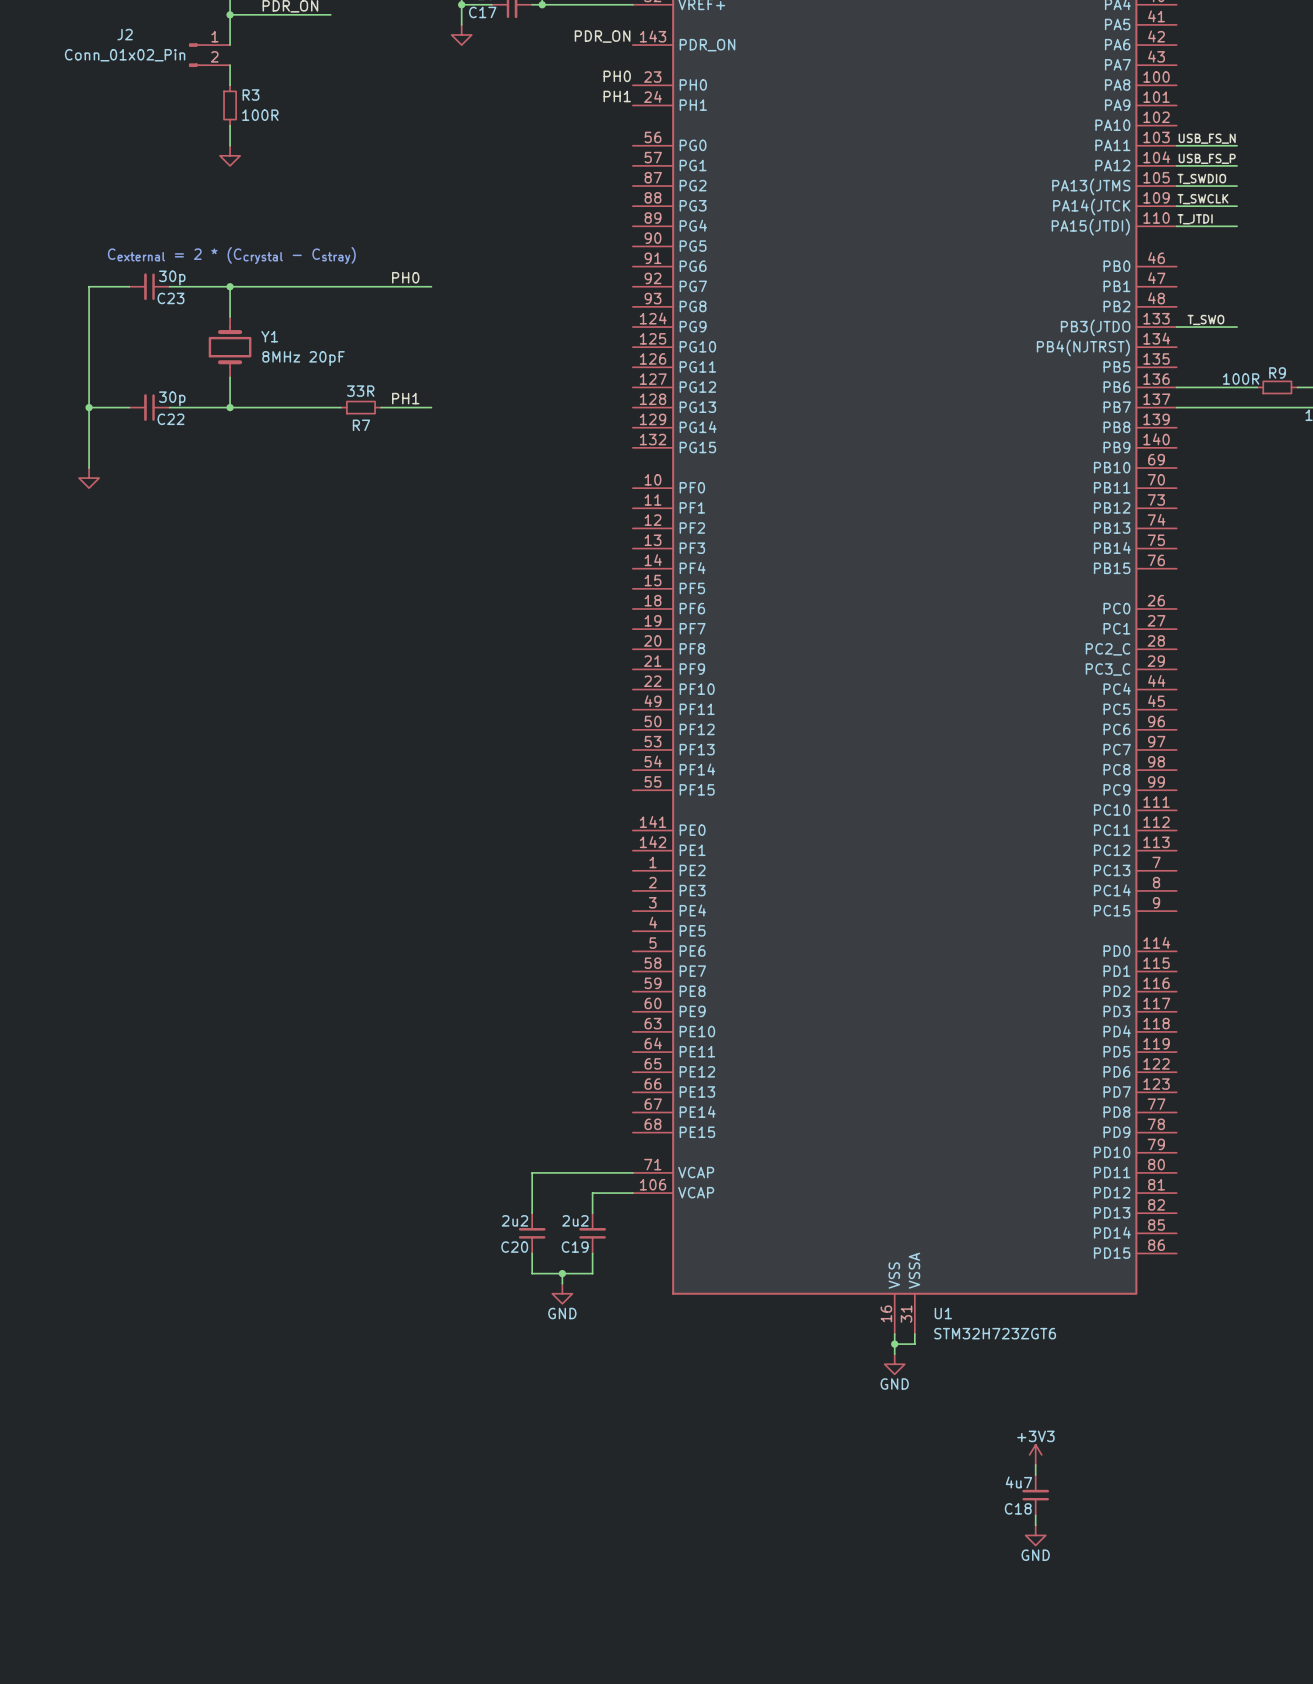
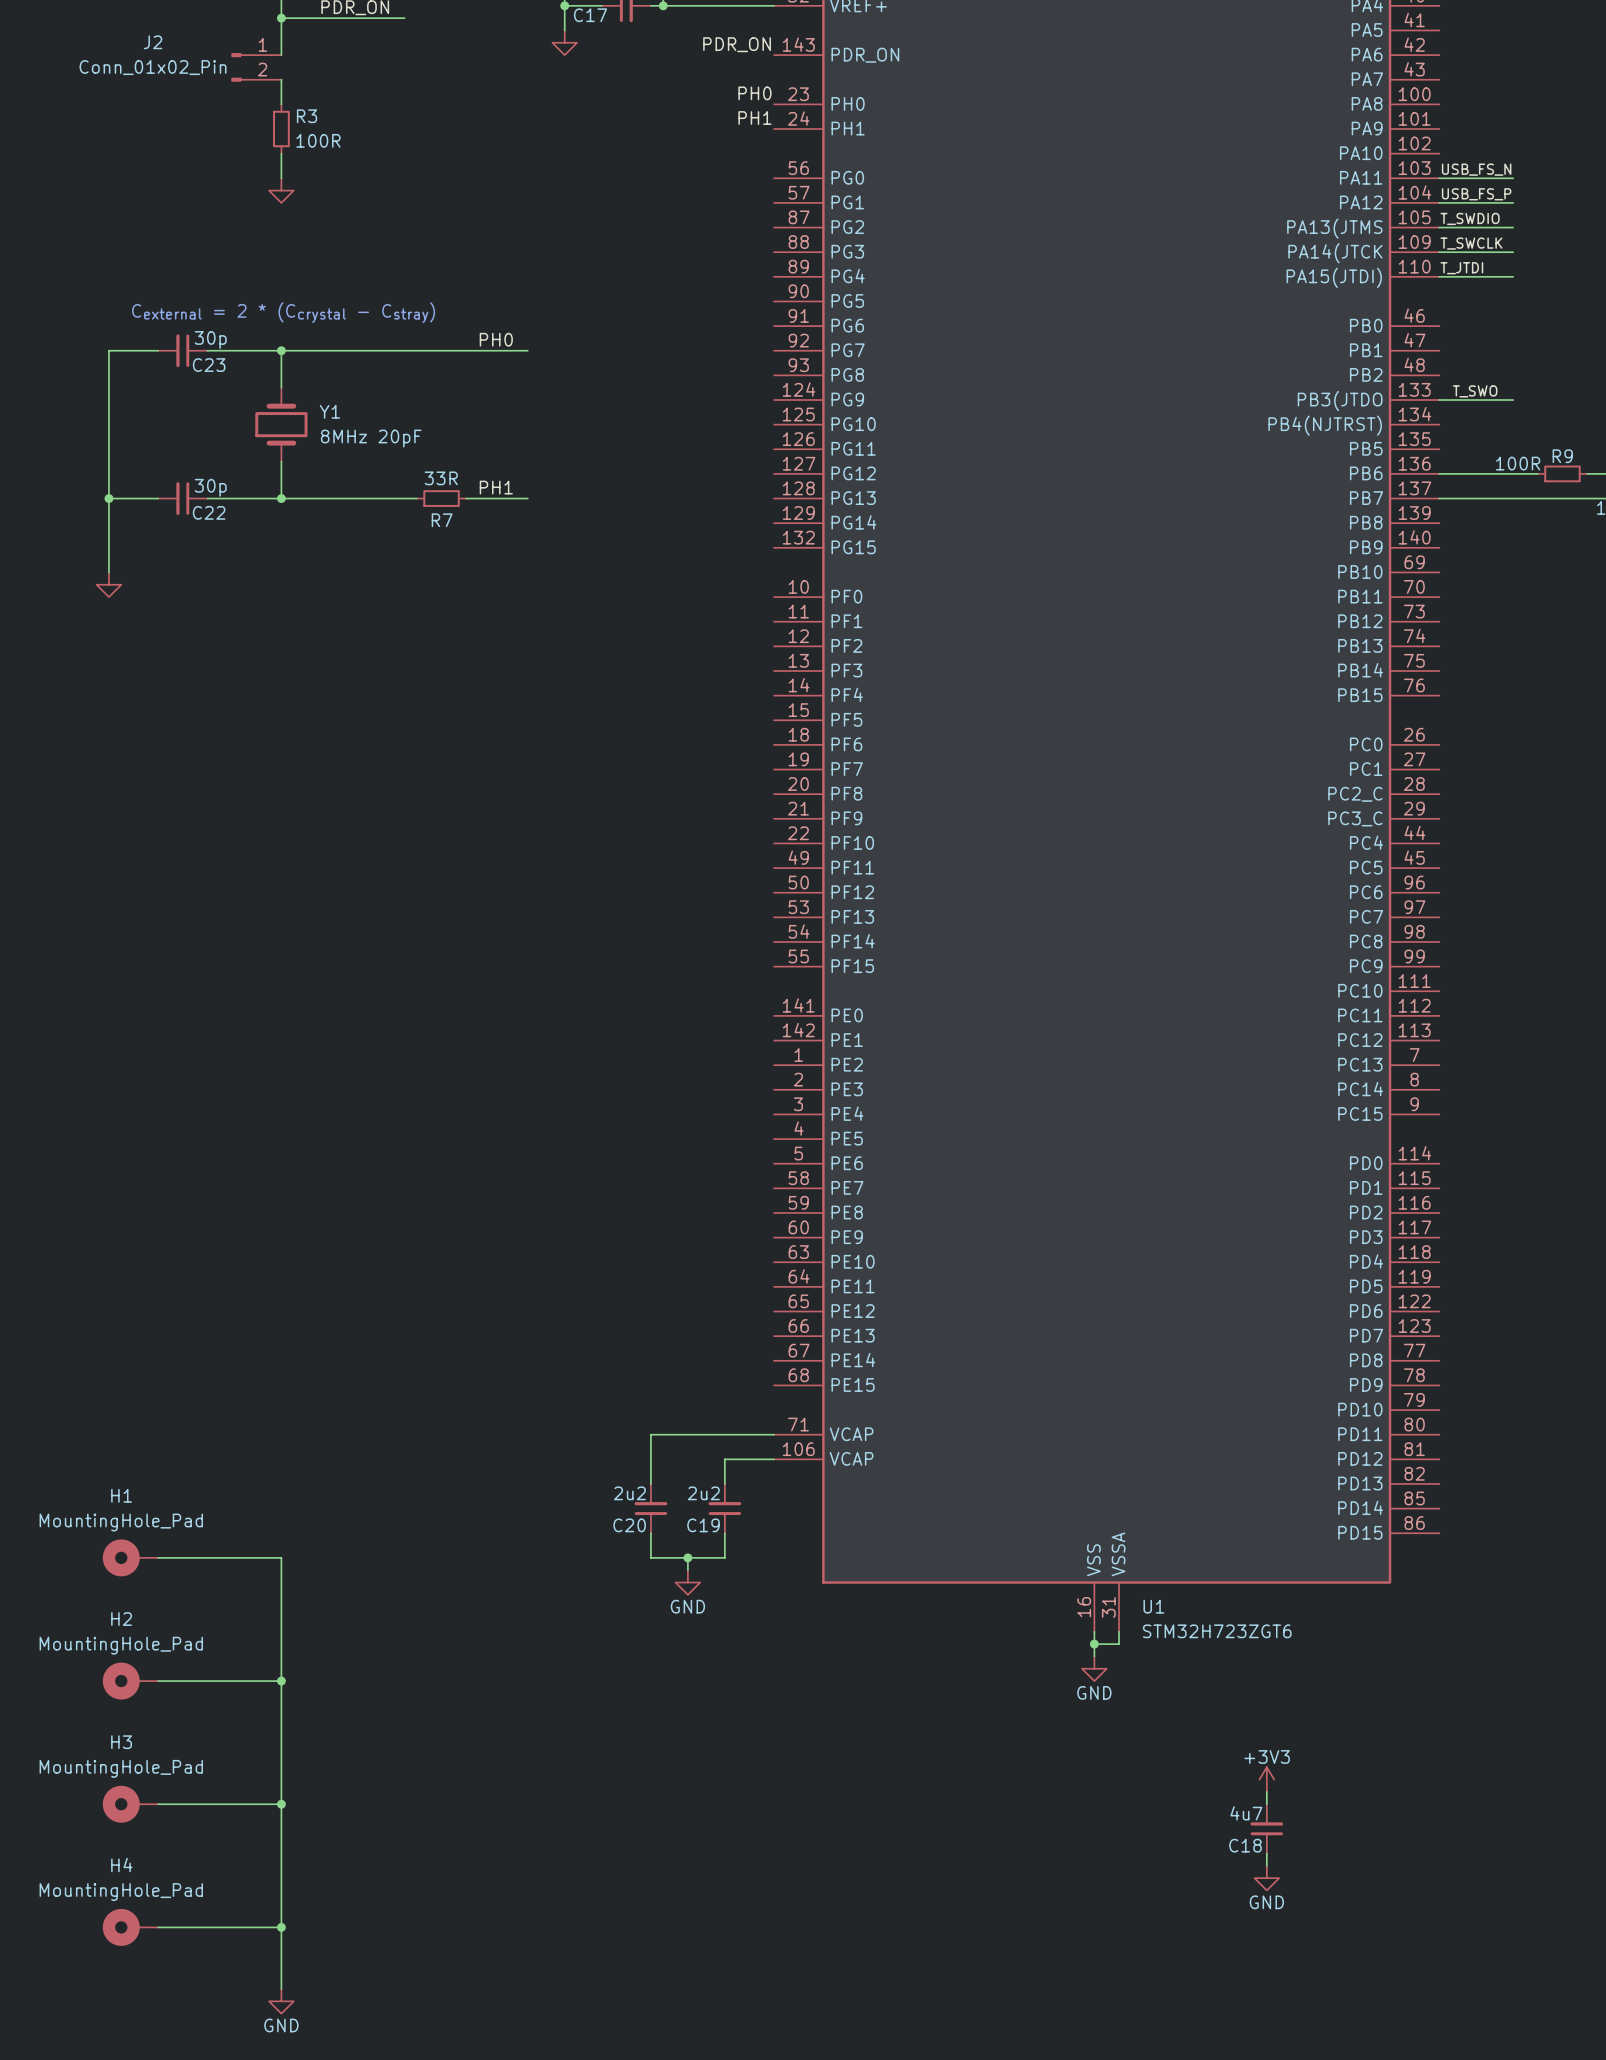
H1: none -> MountingHole_Pad (130, 1557)
wire: none -> (158, 1557) (281, 1557) (281, 1989)
H2: none -> MountingHole_Pad (130, 1681)
wire: none -> (158, 1681) (281, 1681)
junction: none -> (281, 1681)
H3: none -> MountingHole_Pad (130, 1804)
wire: none -> (158, 1804) (281, 1804)
junction: none -> (281, 1804)
H4: none -> MountingHole_Pad (130, 1927)
wire: none -> (158, 1927) (281, 1927)
junction: none -> (281, 1927)
power symbol: none -> GND (281, 2001)

